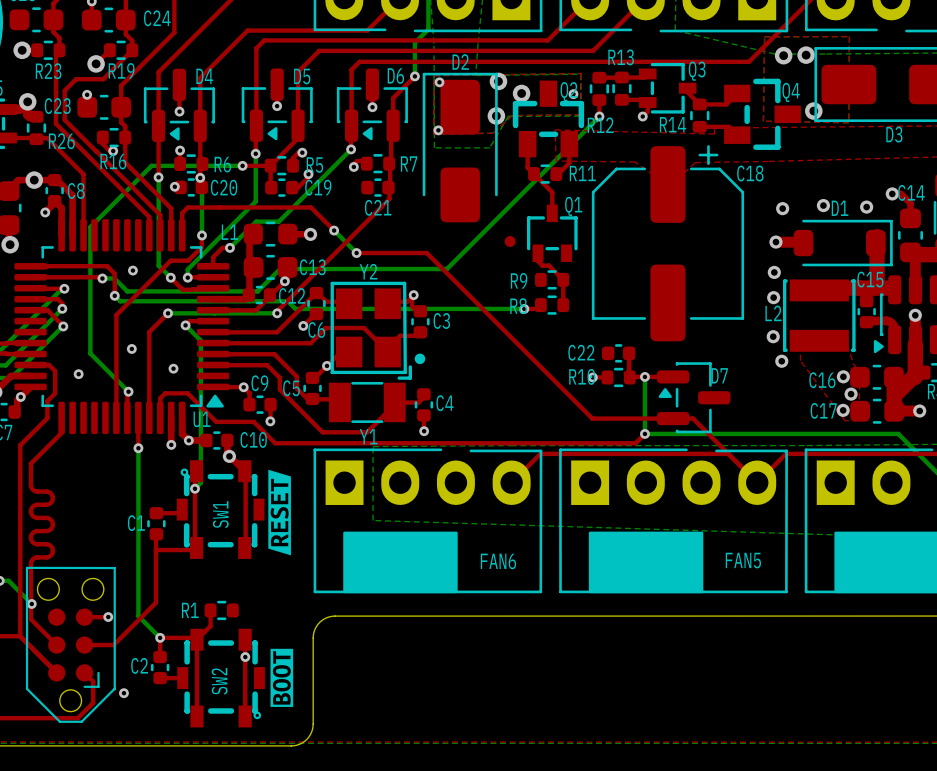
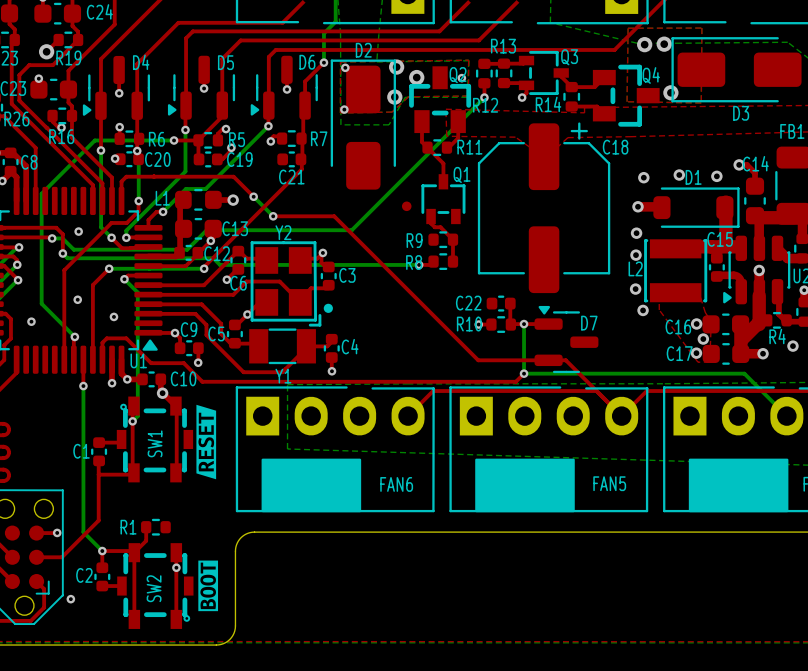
D4 footprint: [143, 68, 215, 143] -> [82, 55, 151, 120]
D5 footprint: [241, 68, 313, 142] -> [167, 55, 236, 120]
D6 footprint: [336, 68, 408, 142] -> [250, 55, 318, 120]
D7 footprint: [657, 362, 731, 434] -> [534, 305, 599, 374]

